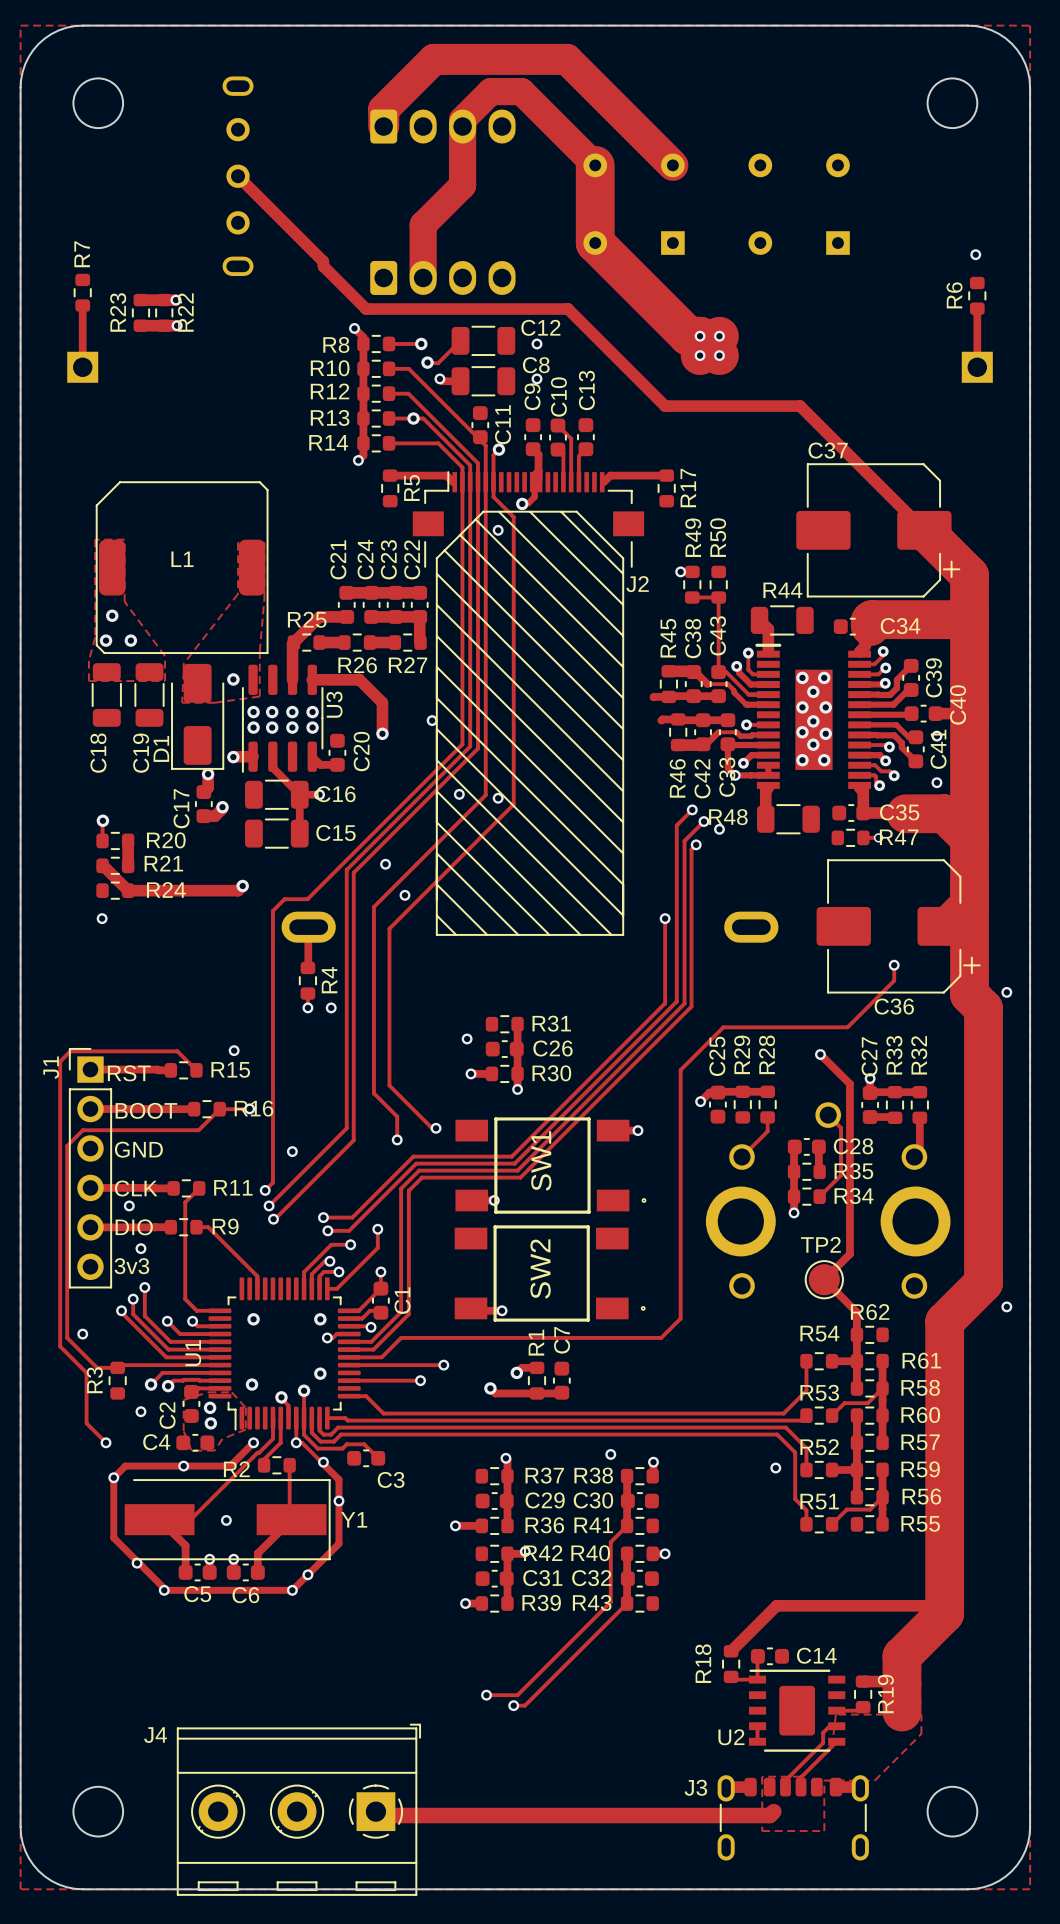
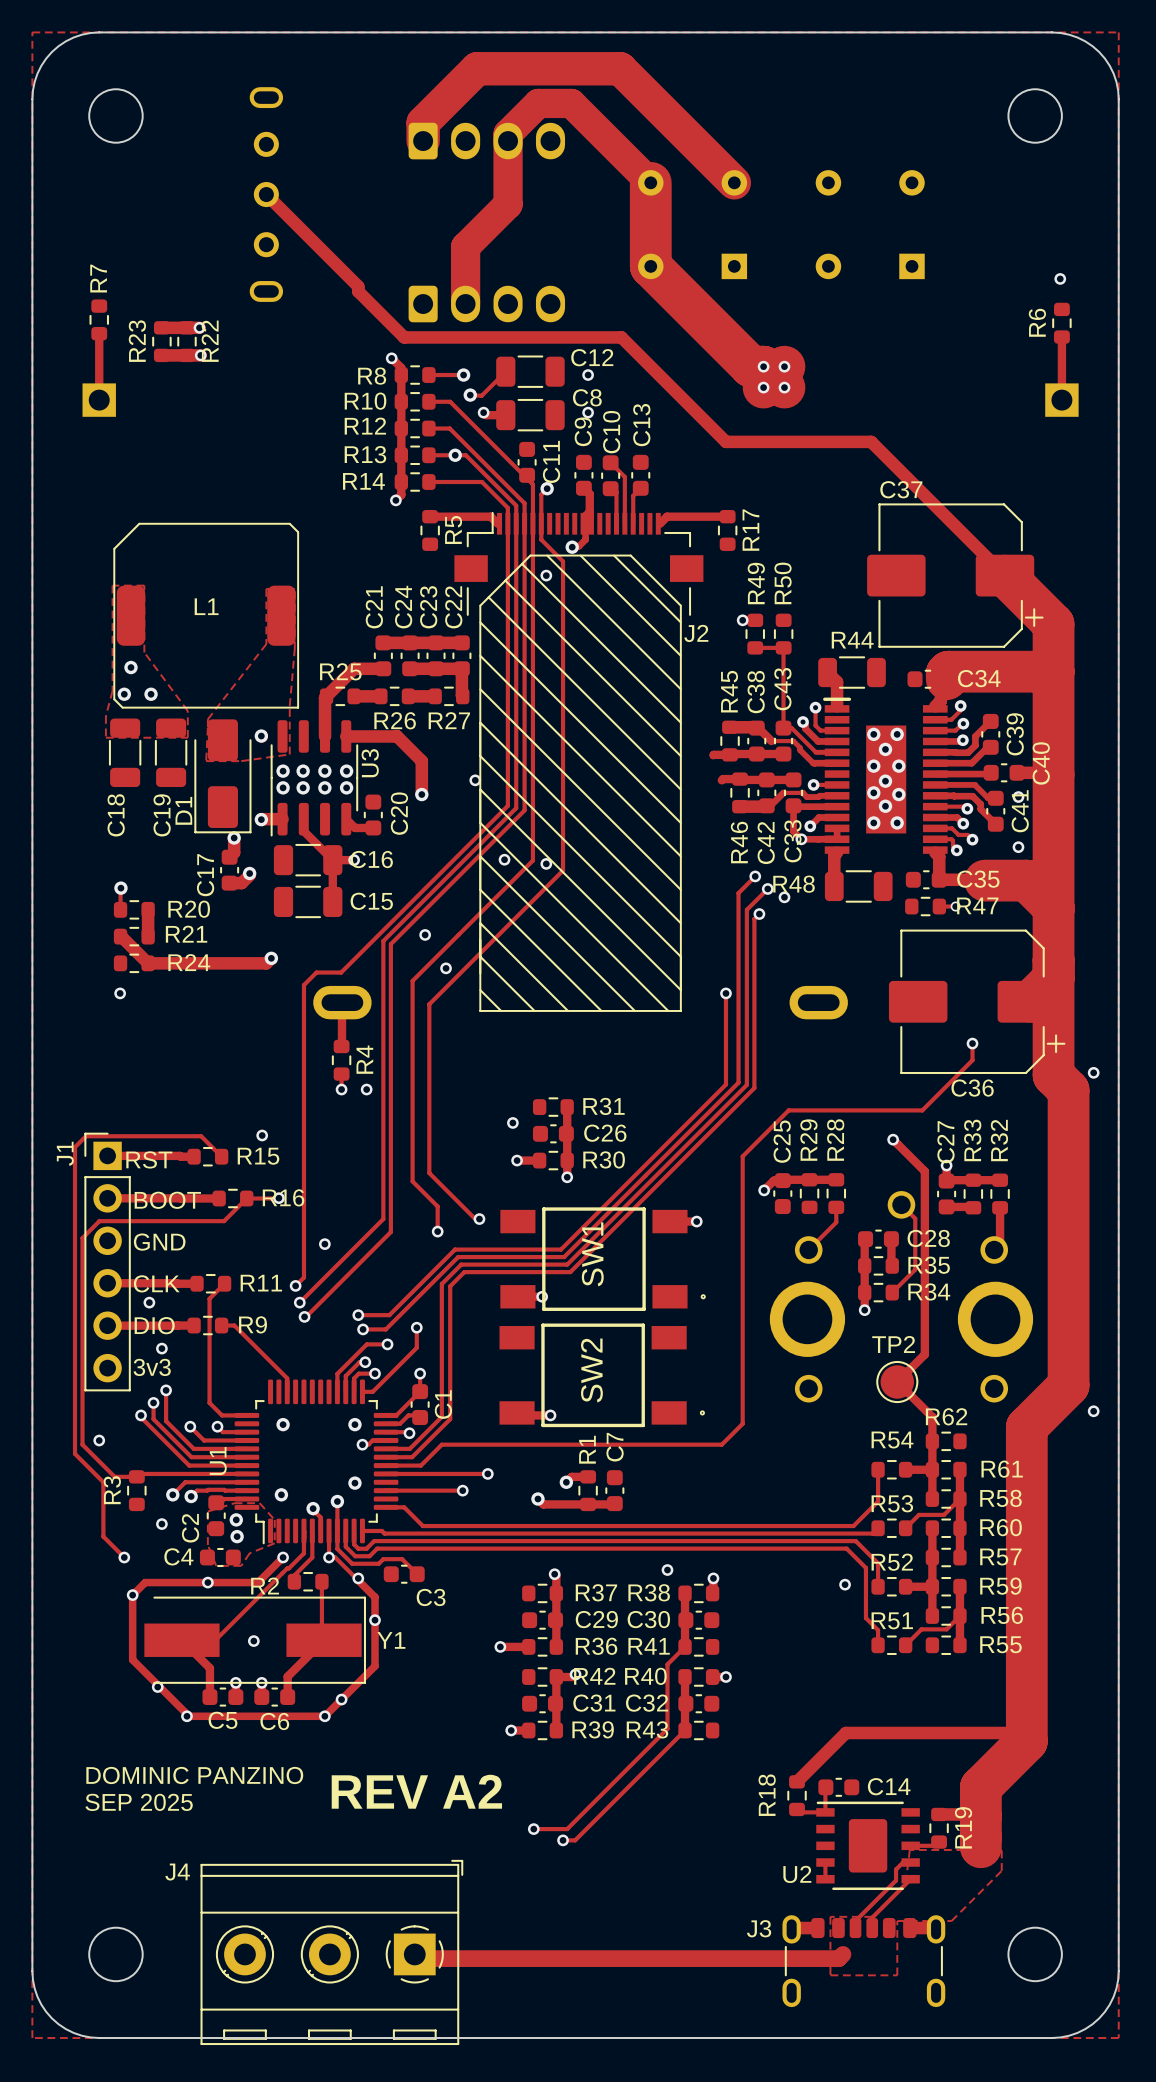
text: none -> DOMINIC PANZINO (194, 1775)
text: none -> REV A2 (416, 1791)
text: none -> SEP 2025 (139, 1802)

